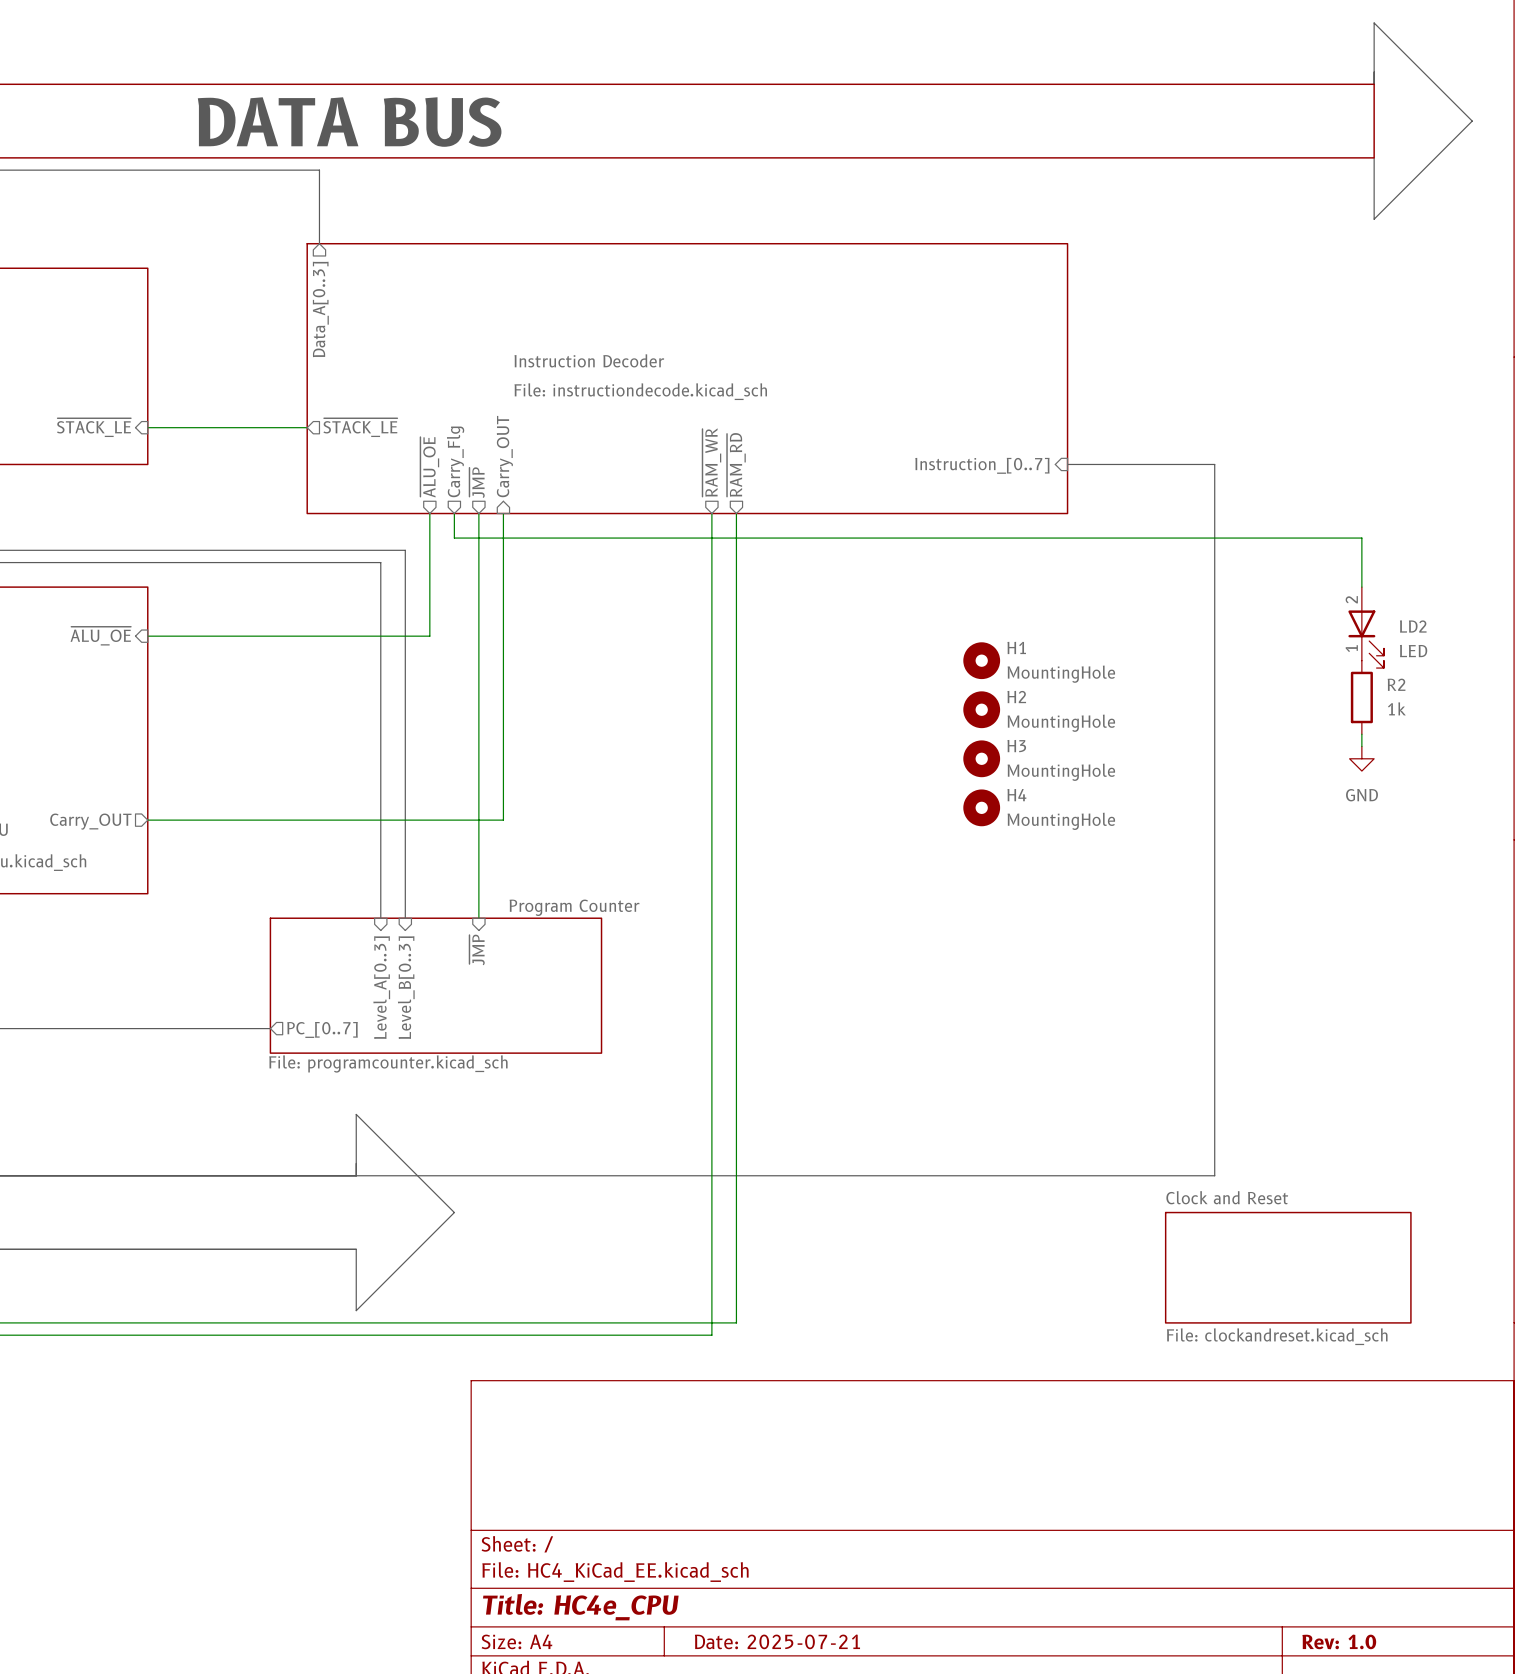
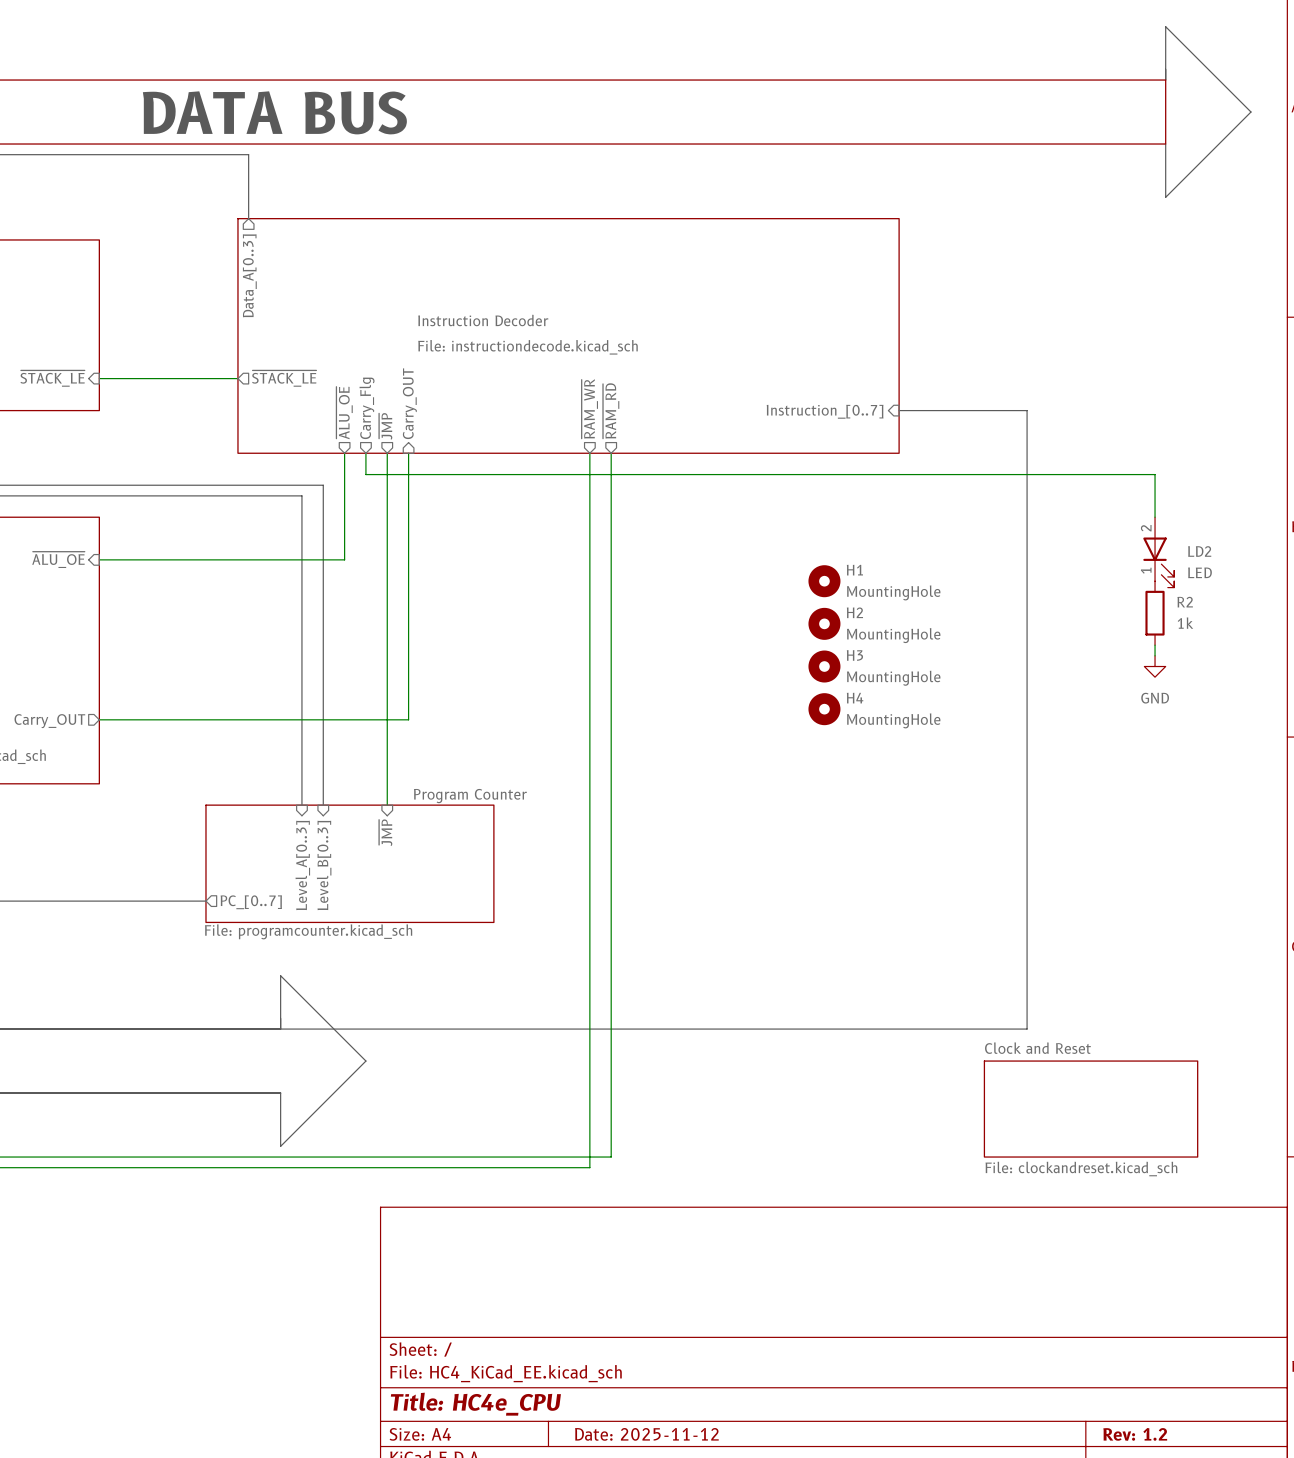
title block: Date: 2025-07-21 (777, 1641) -> Date: 2025-11-12 (646, 1434)
title block: Rev: 1.0 (1339, 1641) -> Rev: 1.2 (1135, 1434)

